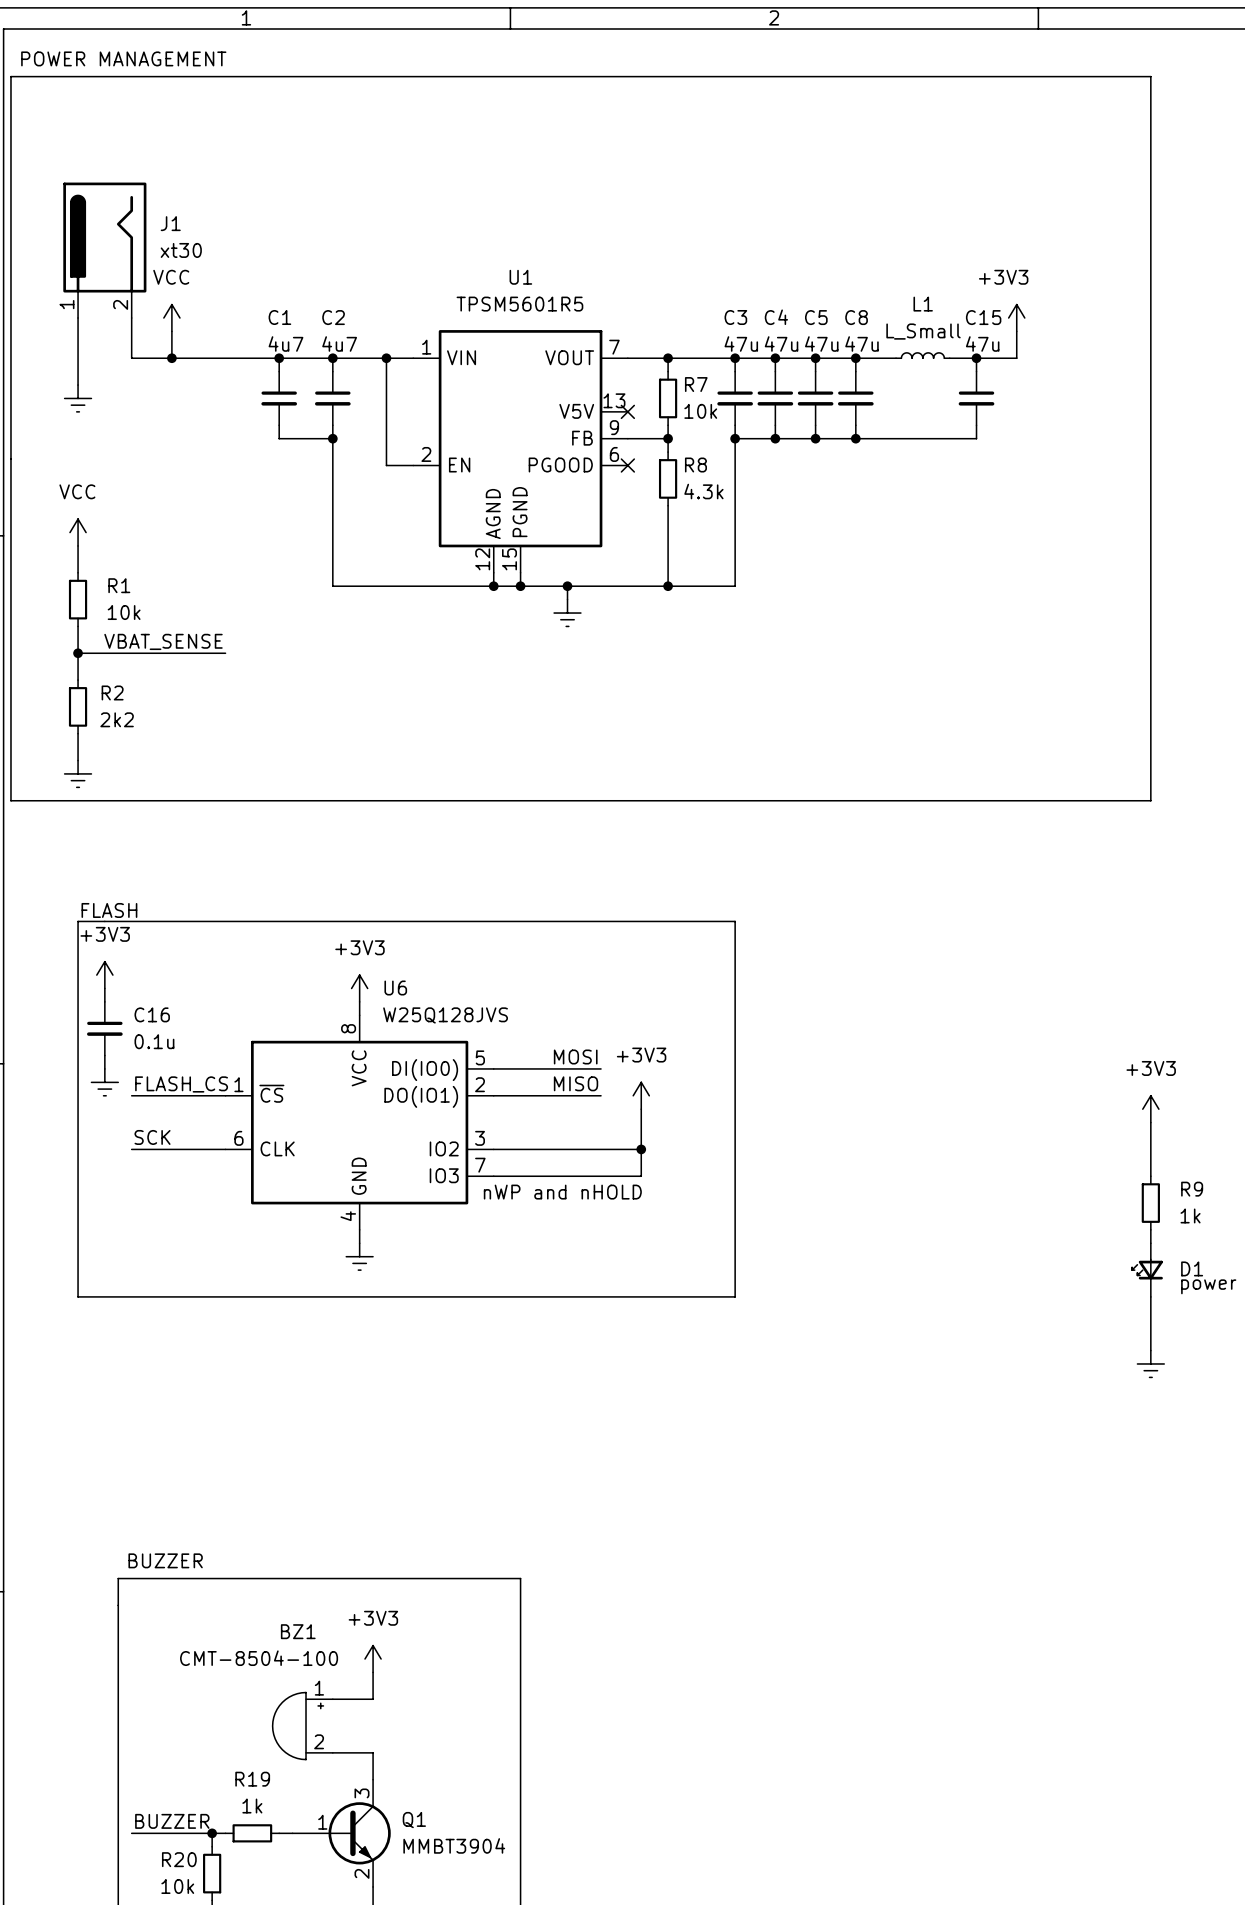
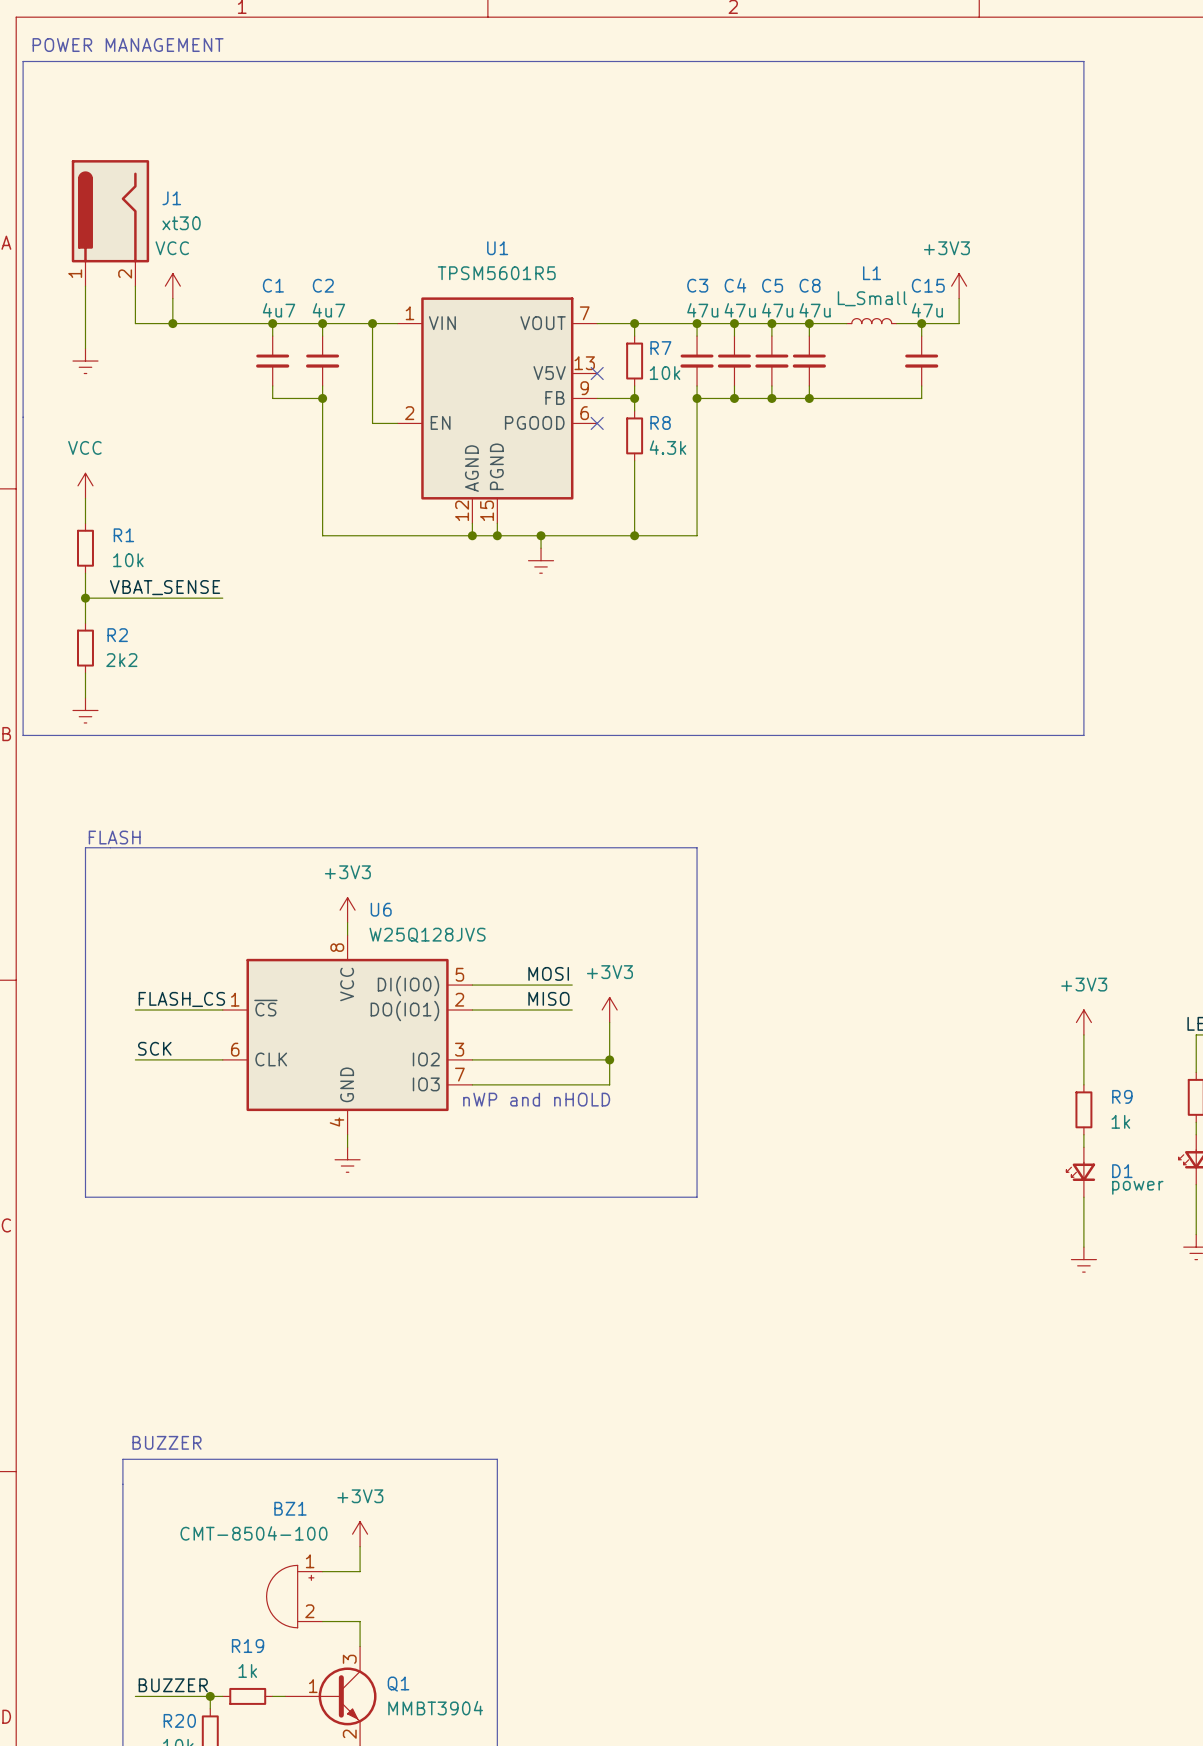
power symbol: +3V3 (104, 975) -> none
wire: (104, 988) (104, 1001) -> none
C16: 0.1u (104, 1028) -> none
wire: (104, 1055) (104, 1068) -> none
power symbol: (104, 1082) -> none

